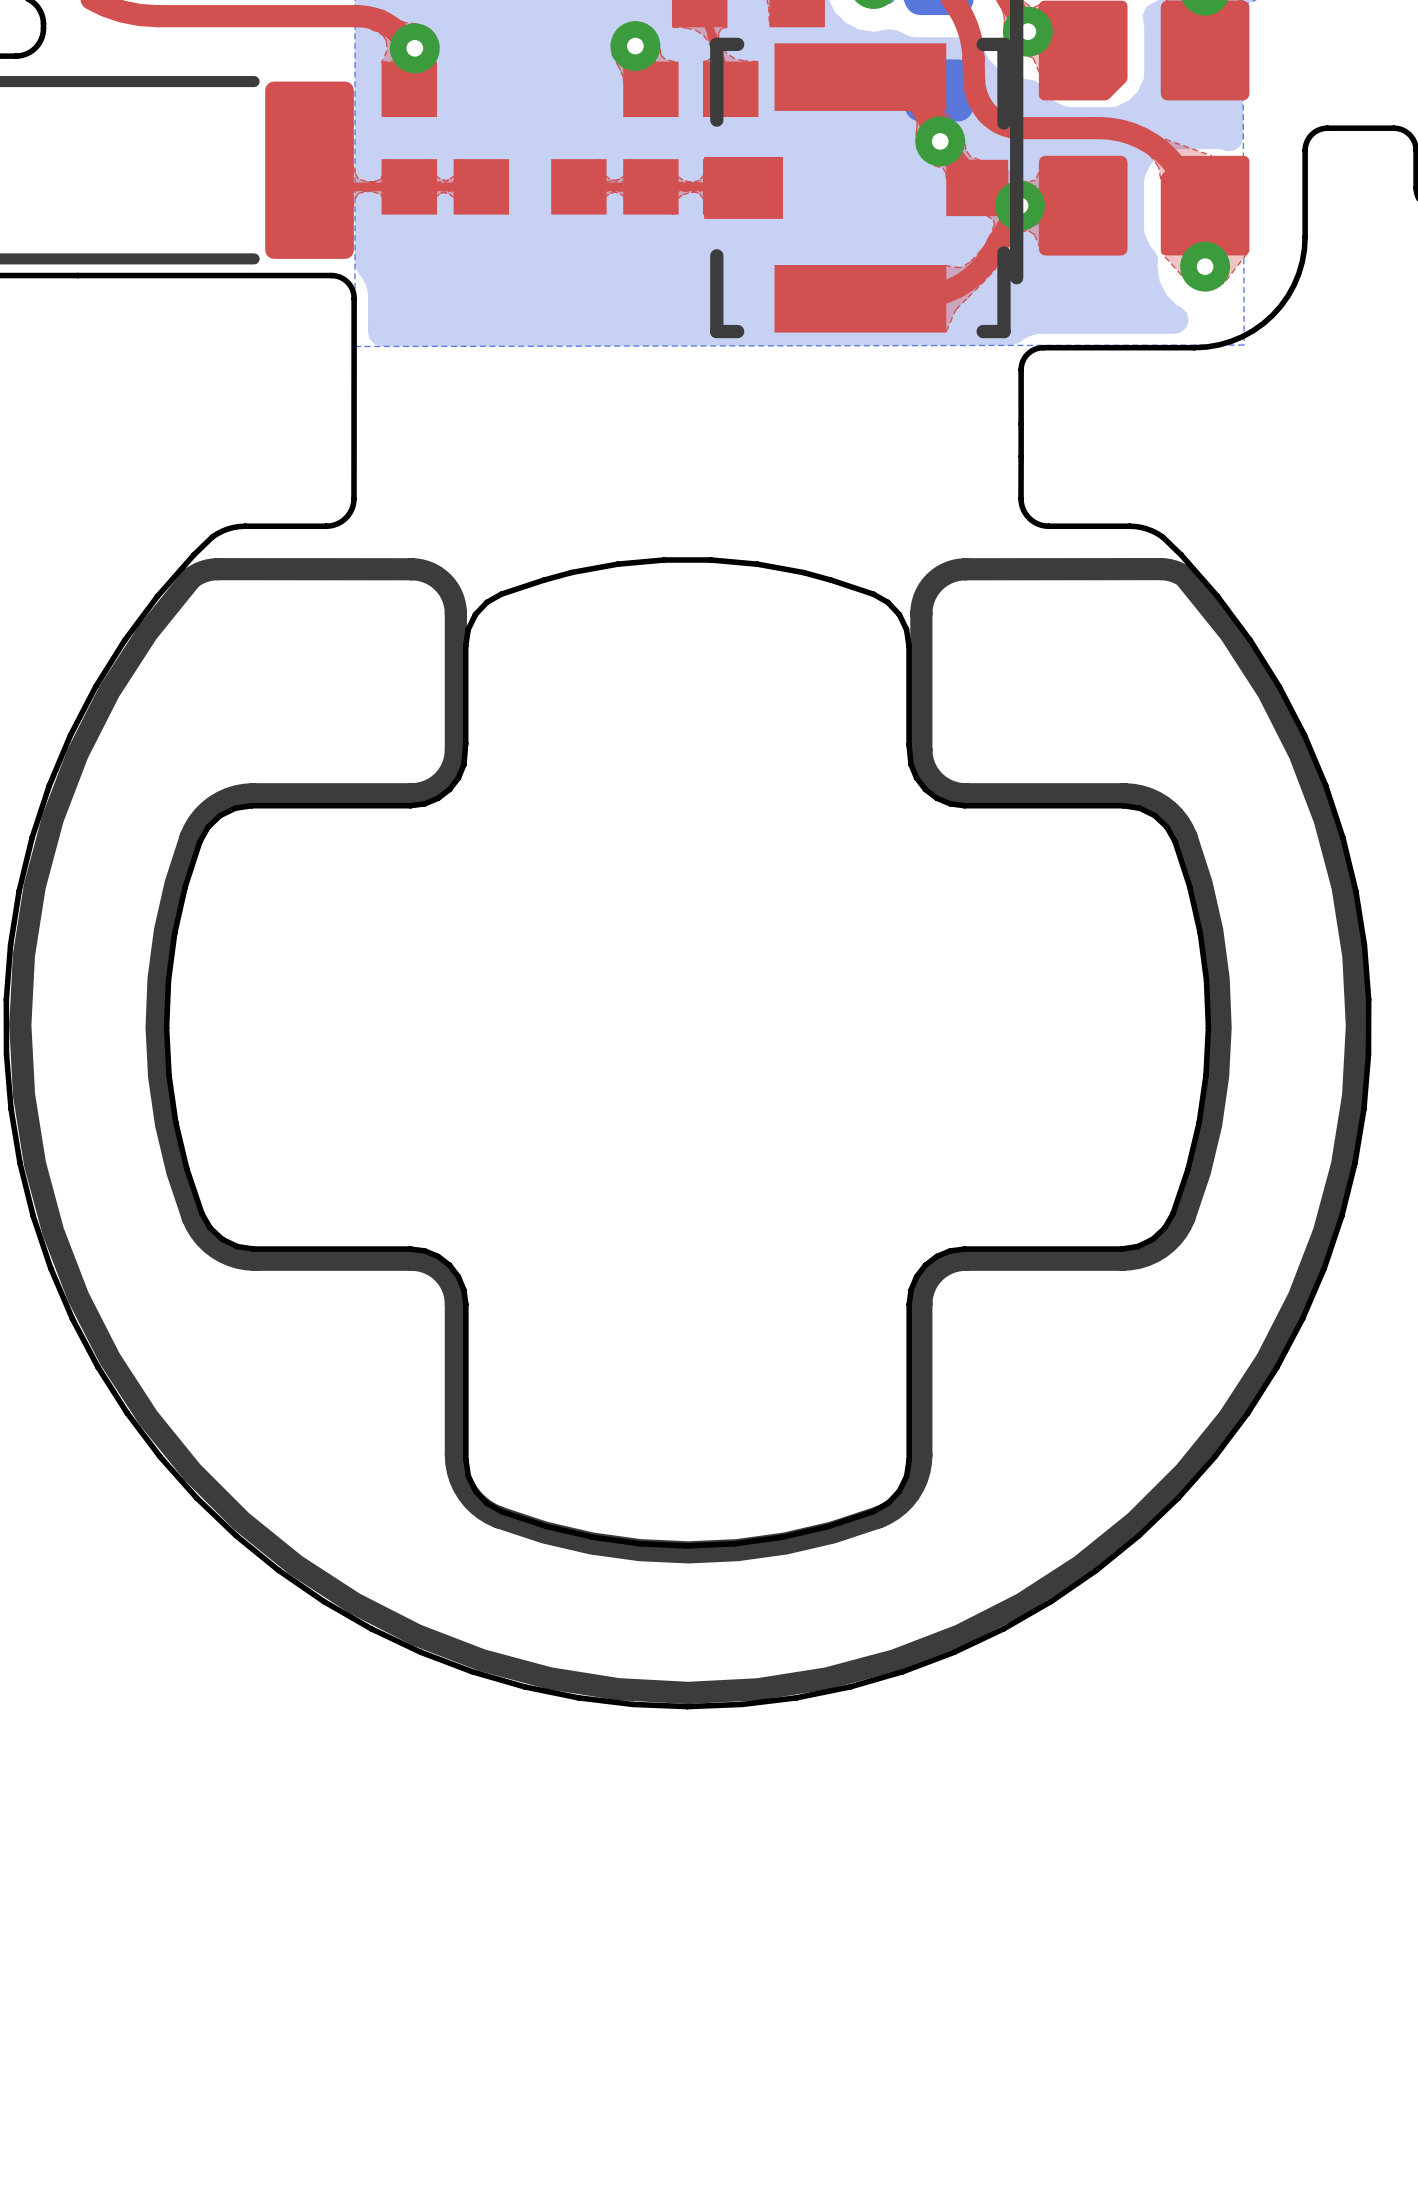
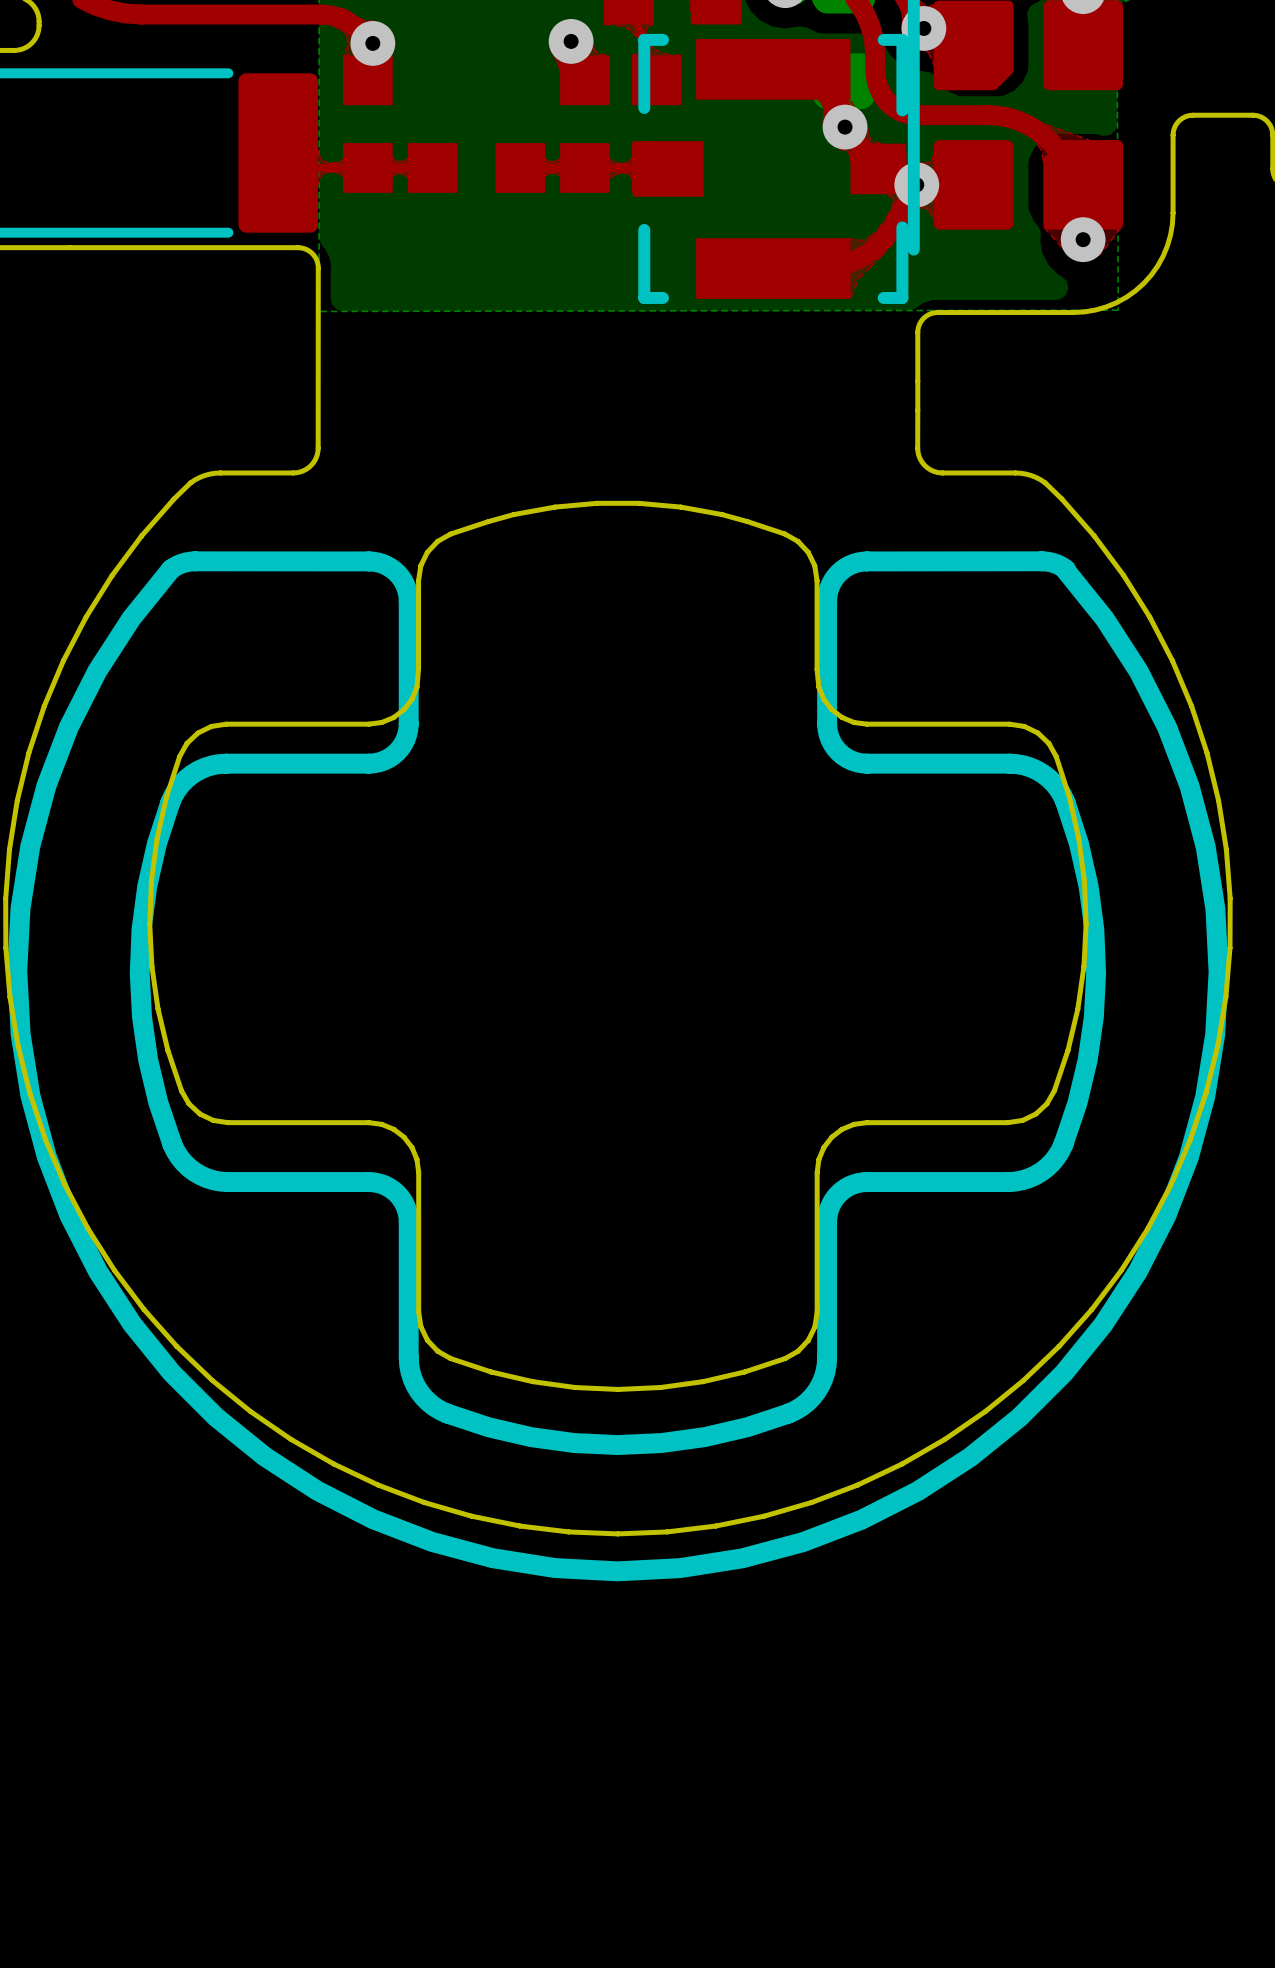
line: (1187, 578) (1174, 571) (1160, 569) (960, 569) (946, 573) (931, 585) (923, 598) (921, 613) (921, 755) (927, 772) (938, 785) (948, 790) (965, 794) (1124, 794) (1140, 796) (1155, 801) (1168, 811) (1179, 823) (1186, 837) (1201, 883) (1212, 930) (1218, 979) (1220, 1027) (1218, 1076) (1211, 1124) (1199, 1171) (1181, 1224) (1172, 1237) (1160, 1248) (1145, 1255) (1130, 1259) (965, 1259) (951, 1262) (942, 1266) (928, 1280) (921, 1299) (920, 1463) (917, 1478) (904, 1499) (885, 1513) (832, 1532) (785, 1543) (737, 1550) (688, 1552) (640, 1550) (591, 1543) (544, 1532) (491, 1513) (472, 1499) (463, 1486) (456, 1463) (455, 1299) (449, 1280) (435, 1266) (421, 1260) (411, 1259) (246, 1259) (231, 1255) (217, 1248) (205, 1237) (196, 1224) (177, 1171) (165, 1124) (159, 1076) (156, 1027) (158, 979) (164, 930) (175, 883) (190, 837) (198, 823) (208, 811) (221, 801) (236, 796) (252, 794) (411, 794) (422, 792) (438, 785) (449, 772) (455, 755) (455, 613) (451, 594) (442, 582) (430, 573) (416, 569) (218, 569) (203, 571) (191, 578) (147, 632) (109, 691) (77, 753) (52, 818) (34, 886) (23, 955) (20, 1025) (24, 1094) (35, 1163) (53, 1231) (78, 1296) (109, 1358) (148, 1417) (192, 1471) (241, 1521) (295, 1565) (354, 1603) (416, 1635) (481, 1660) (549, 1678) (618, 1689) (688, 1692) (758, 1689) (827, 1678) (894, 1660) (959, 1635) (1022, 1603) (1080, 1565) (1135, 1521) (1184, 1472) (1228, 1418) (1266, 1359) (1298, 1297) (1323, 1232) (1342, 1164) (1353, 1095) (1356, 1025) (1353, 956) (1342, 887) (1324, 819) (1299, 754) (1268, 691) (1230, 633) (1186, 578) -> (1065, 569) (1054, 563) (1041, 561) (862, 561) (845, 567) (835, 576) (829, 588) (827, 601) (827, 729) (832, 743) (842, 755) (856, 762) (866, 763) (1009, 763) (1023, 765) (1037, 770) (1049, 778) (1058, 789) (1065, 802) (1078, 843) (1088, 886) (1094, 929) (1096, 973) (1093, 1016) (1087, 1060) (1077, 1102) (1060, 1150) (1052, 1162) (1041, 1171) (1028, 1178) (1015, 1181) (866, 1182) (845, 1188) (833, 1200) (827, 1217) (826, 1364) (823, 1378) (812, 1397) (795, 1410) (747, 1427) (704, 1437) (661, 1443) (617, 1445) (574, 1443) (531, 1437) (488, 1427) (440, 1410) (423, 1397) (412, 1378) (409, 1364) (408, 1217) (402, 1200) (390, 1188) (368, 1182) (220, 1181) (206, 1178) (194, 1171) (183, 1162) (175, 1150) (158, 1102) (148, 1060) (141, 1016) (139, 973) (141, 929) (147, 886) (156, 843) (170, 802) (177, 789) (186, 778) (198, 770) (211, 765) (226, 763) (368, 763) (384, 760) (393, 755) (403, 743) (408, 729) (408, 601) (406, 588) (400, 576) (386, 565) (373, 561) (195, 561) (182, 563) (170, 569) (131, 618) (97, 671) (68, 727) (46, 785) (30, 846) (20, 908) (17, 971) (20, 1033) (30, 1095) (46, 1156) (69, 1215) (97, 1271) (132, 1323) (171, 1372) (216, 1417) (264, 1456) (317, 1490) (373, 1519) (432, 1541) (492, 1558) (554, 1568) (617, 1571) (680, 1568) (742, 1558) (803, 1542) (861, 1519) (917, 1491) (970, 1457) (1019, 1417) (1063, 1373) (1103, 1324) (1137, 1271) (1166, 1215) (1188, 1157) (1205, 1096) (1215, 1034) (1218, 971) (1215, 909) (1205, 847) (1189, 786) (1167, 727) (1138, 671) (1104, 618) (1065, 569)

